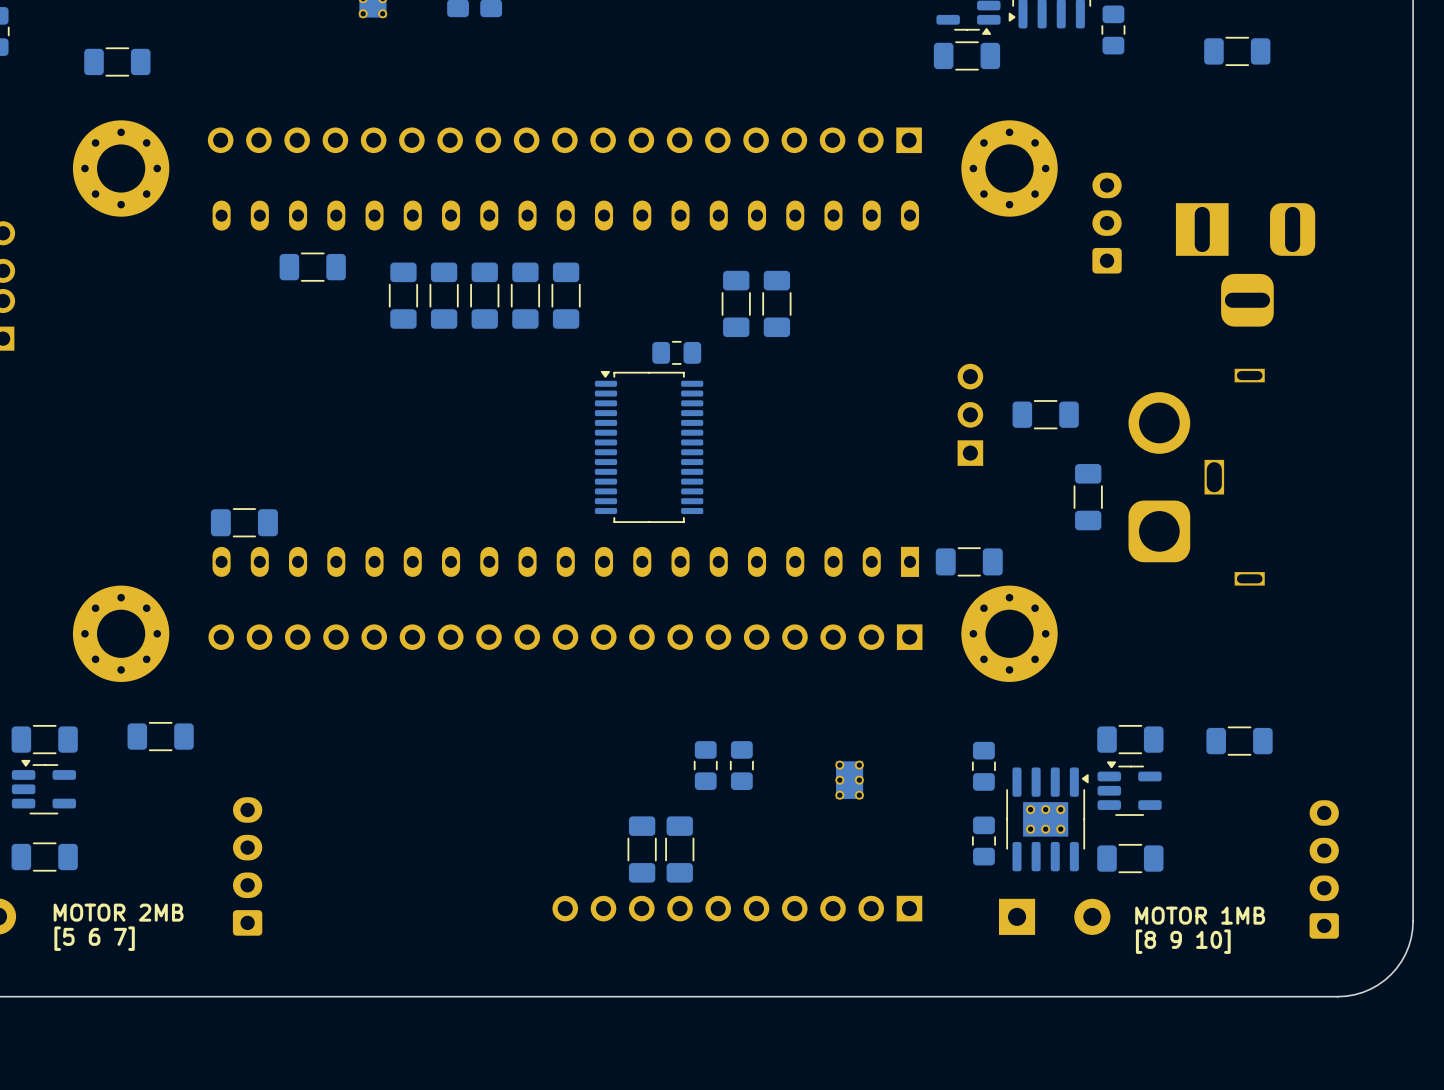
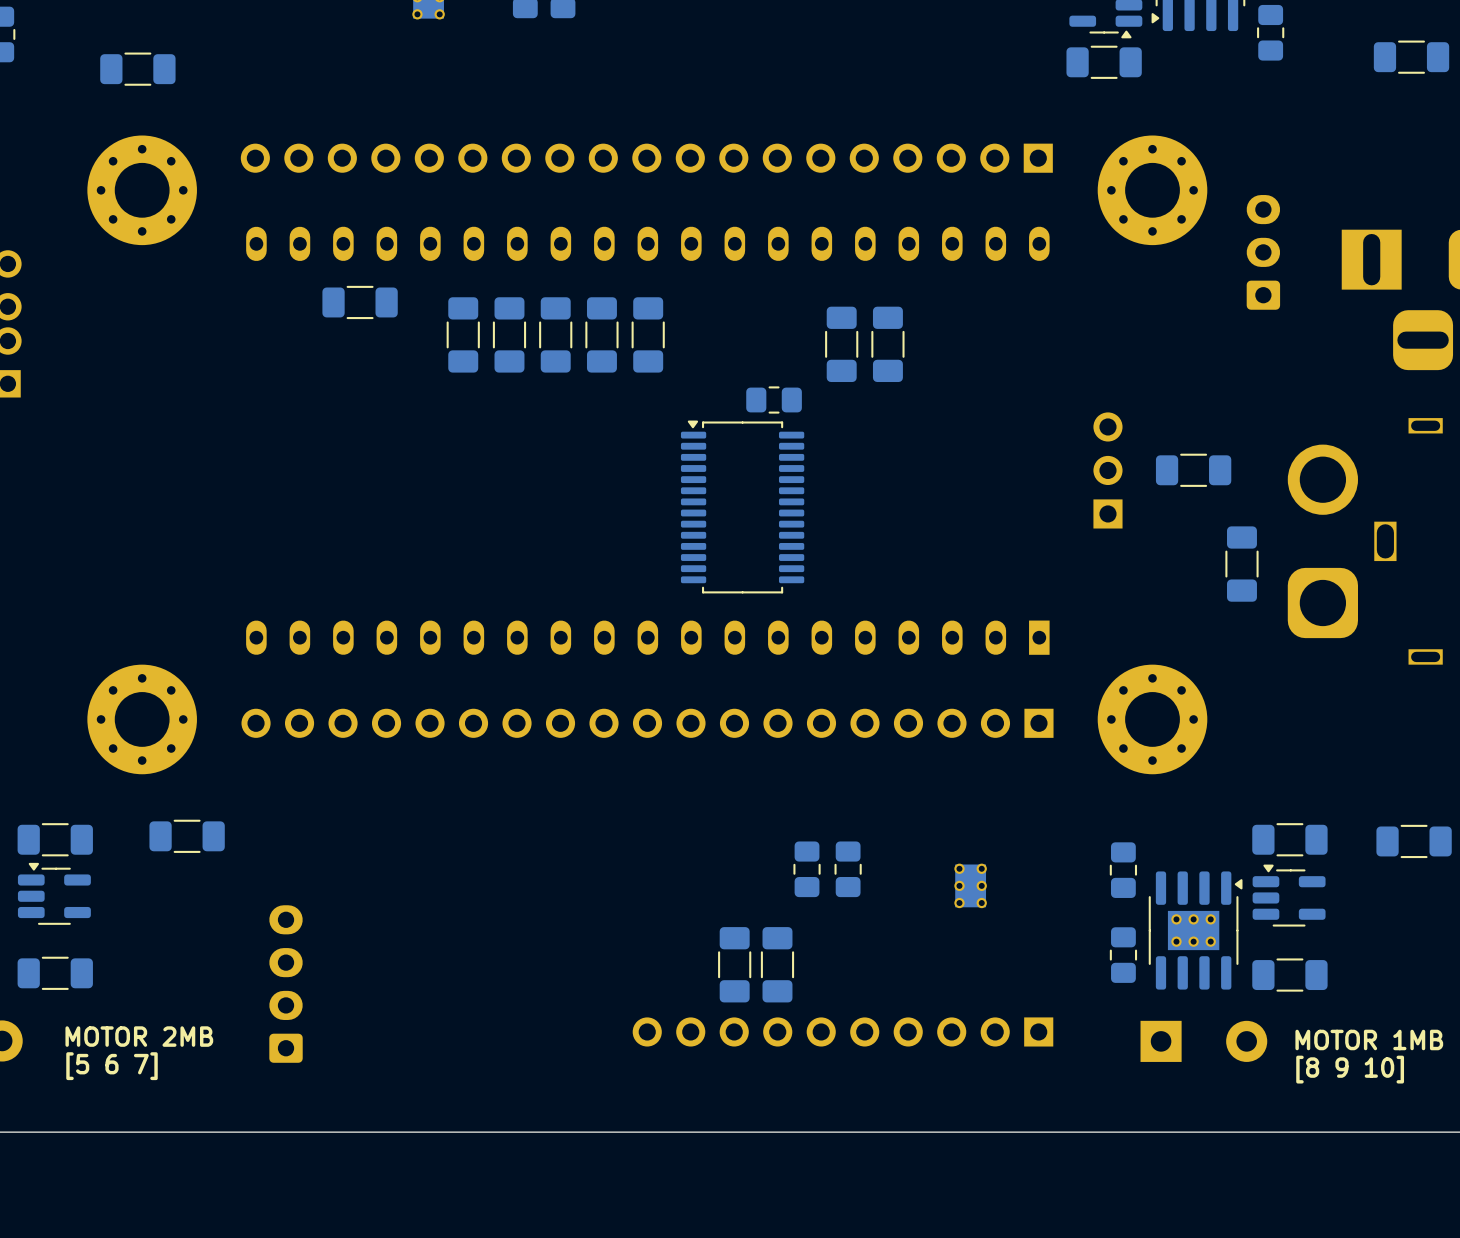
part: (244, 522) -> none
part: (969, 561) -> none

